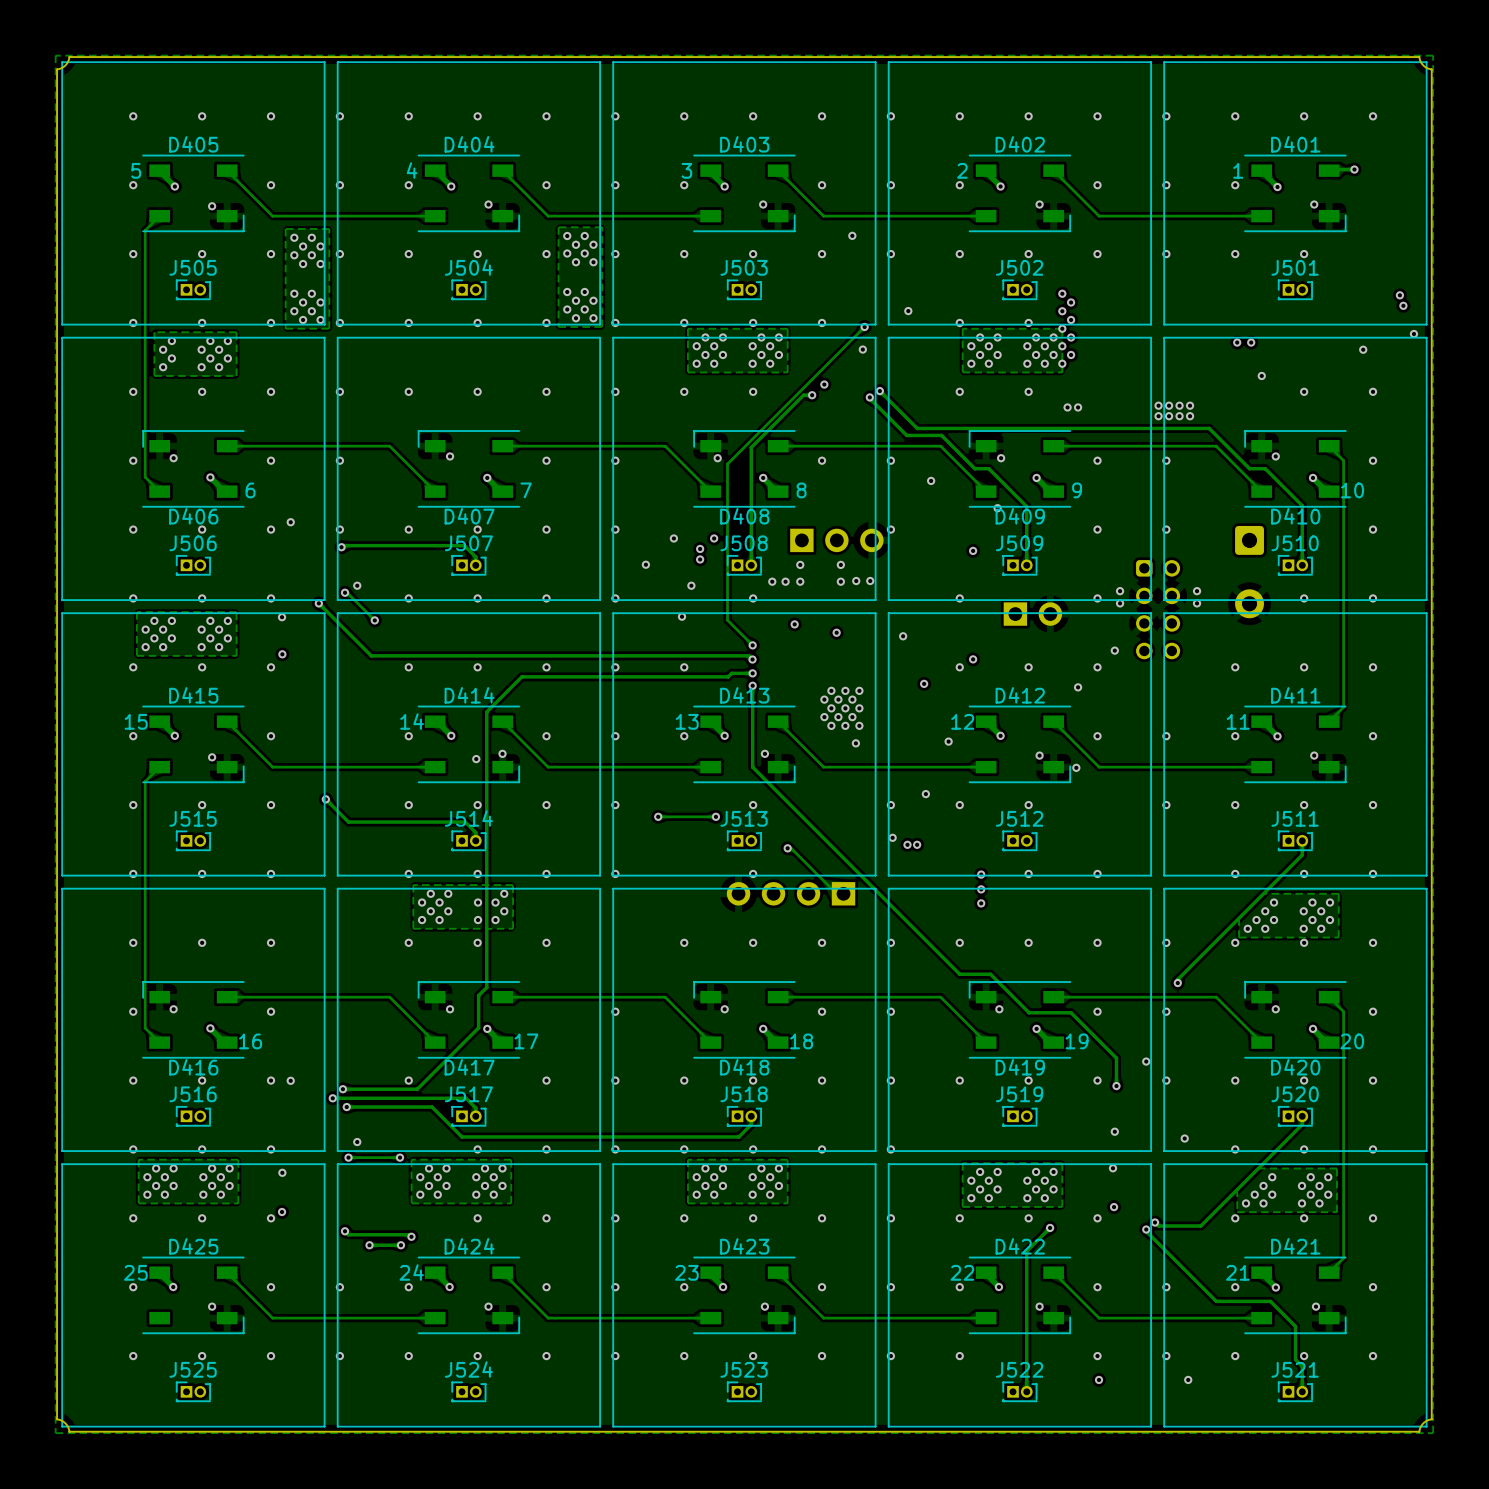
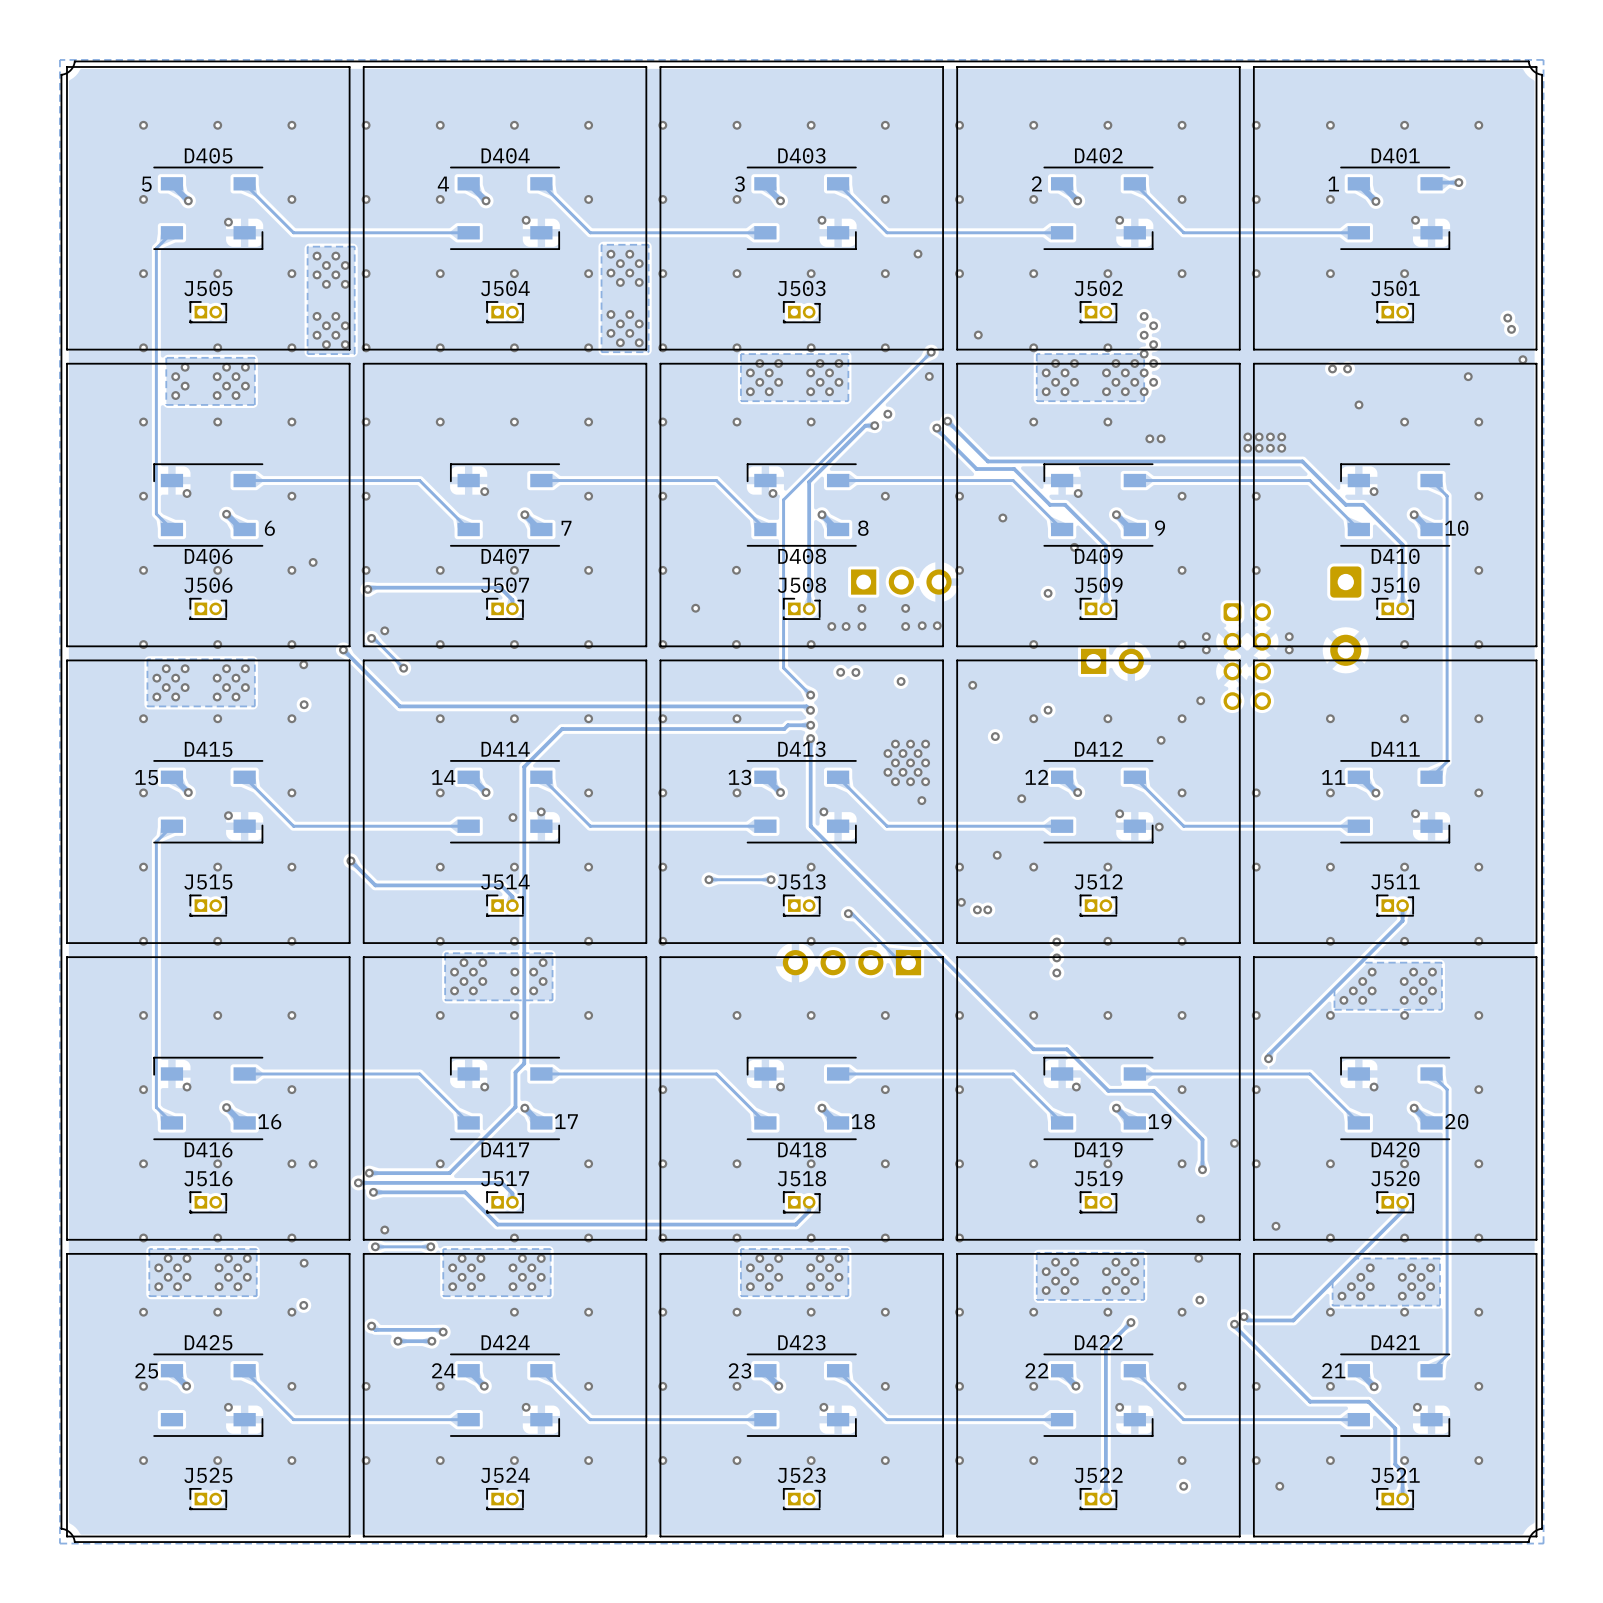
via: none -> (736, 570)
via: (673, 538) -> none
via: (714, 538) -> none
via: (700, 548) -> none
via: (700, 559) -> none
via: (691, 585) -> none
via: none -> (736, 644)
via: (682, 616) -> none
via: none -> (840, 672)

